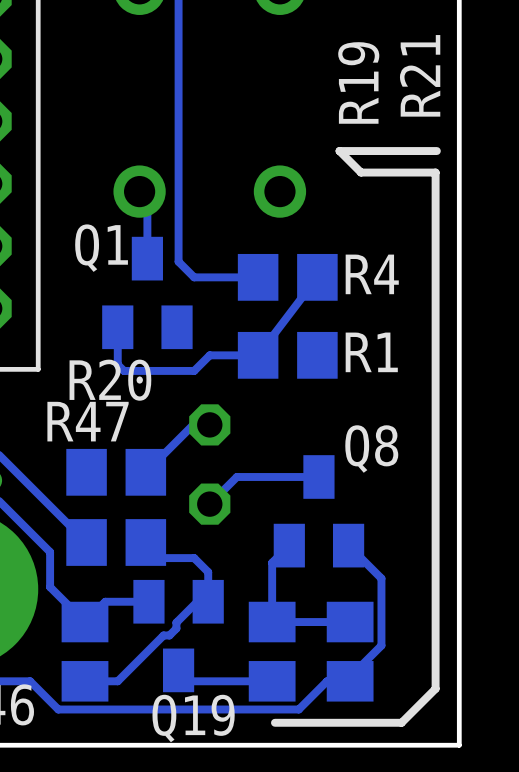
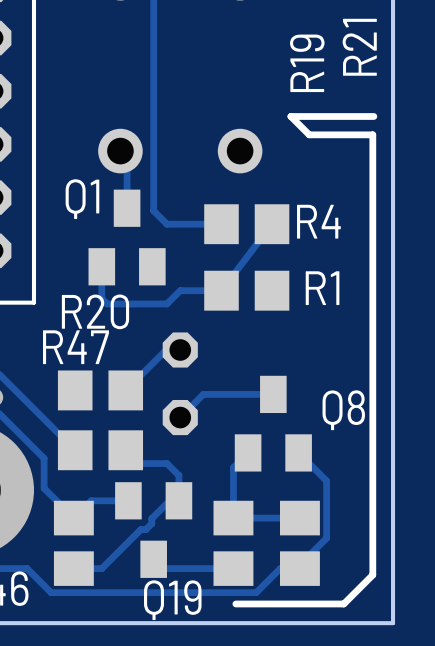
Q8 name position: Q8 (371, 449) -> Q8 (343, 410)

